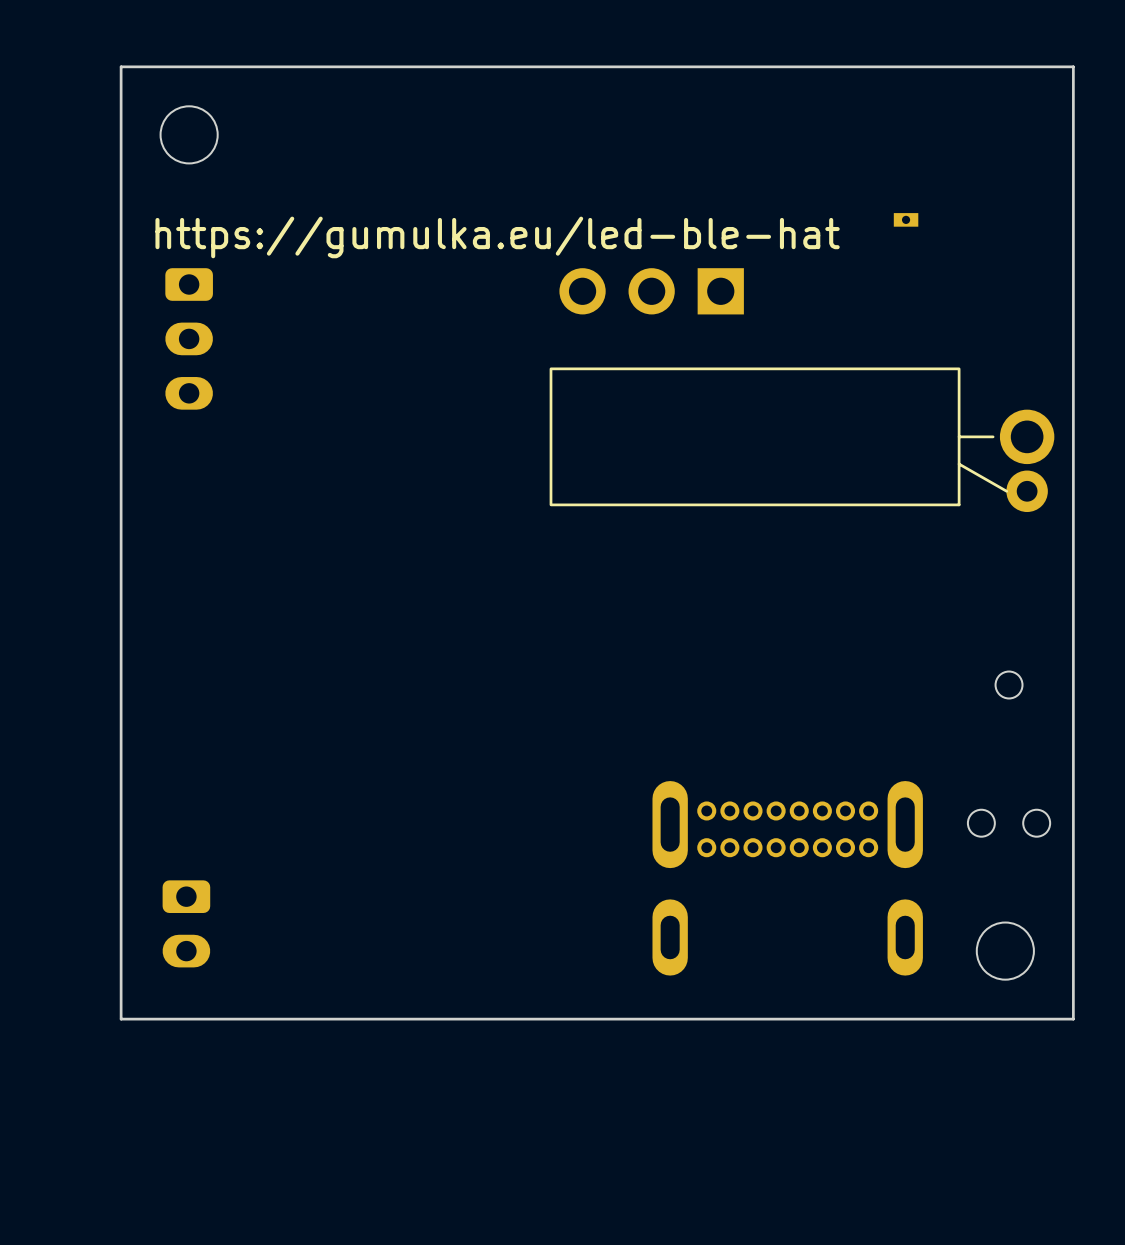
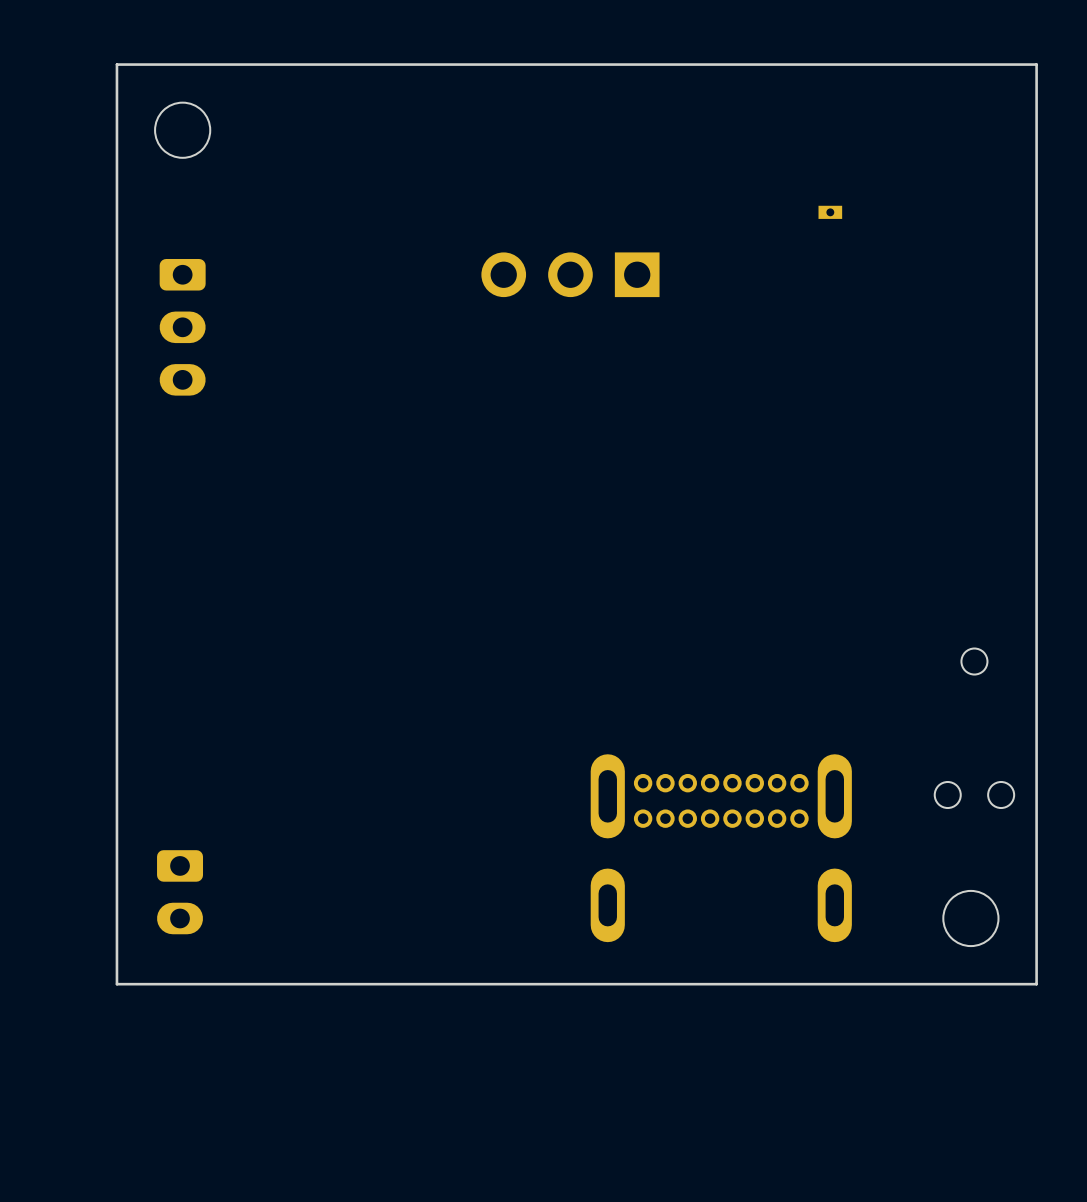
part position: (906, 219) -> (830, 212)
text: https://gumulka.eu/led-ble-hat (497, 237) -> none
part position: (651, 291) -> (570, 274)
part: (801, 439) -> none
part position: (787, 878) -> (721, 848)

